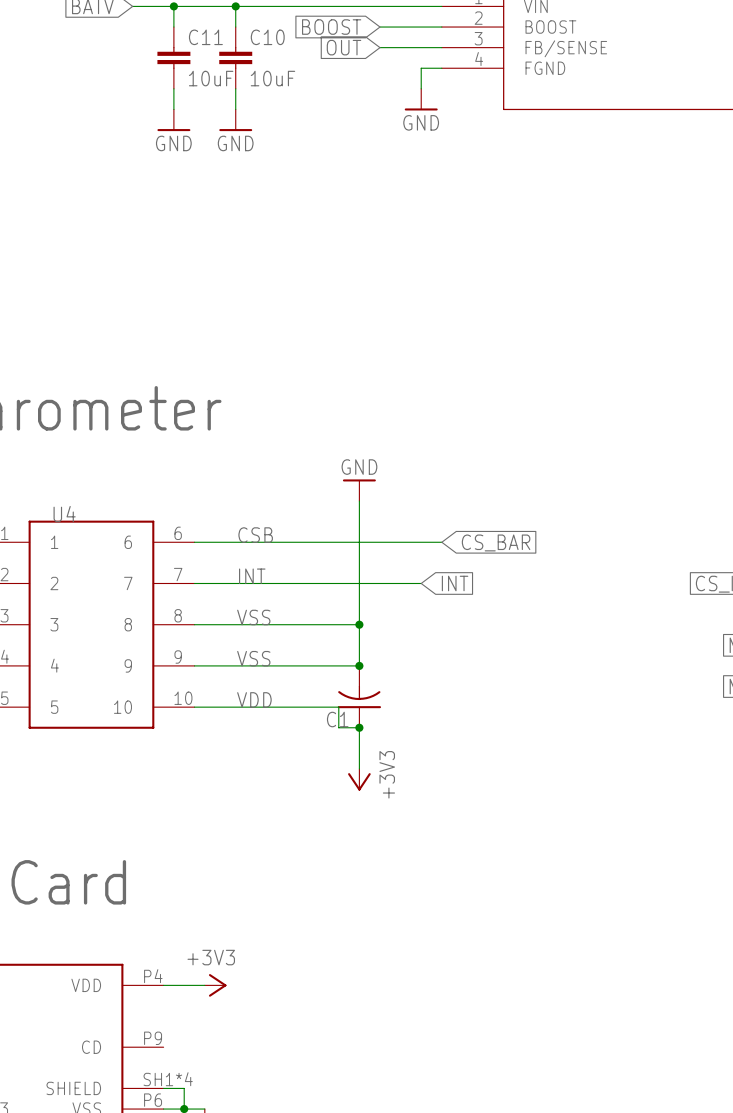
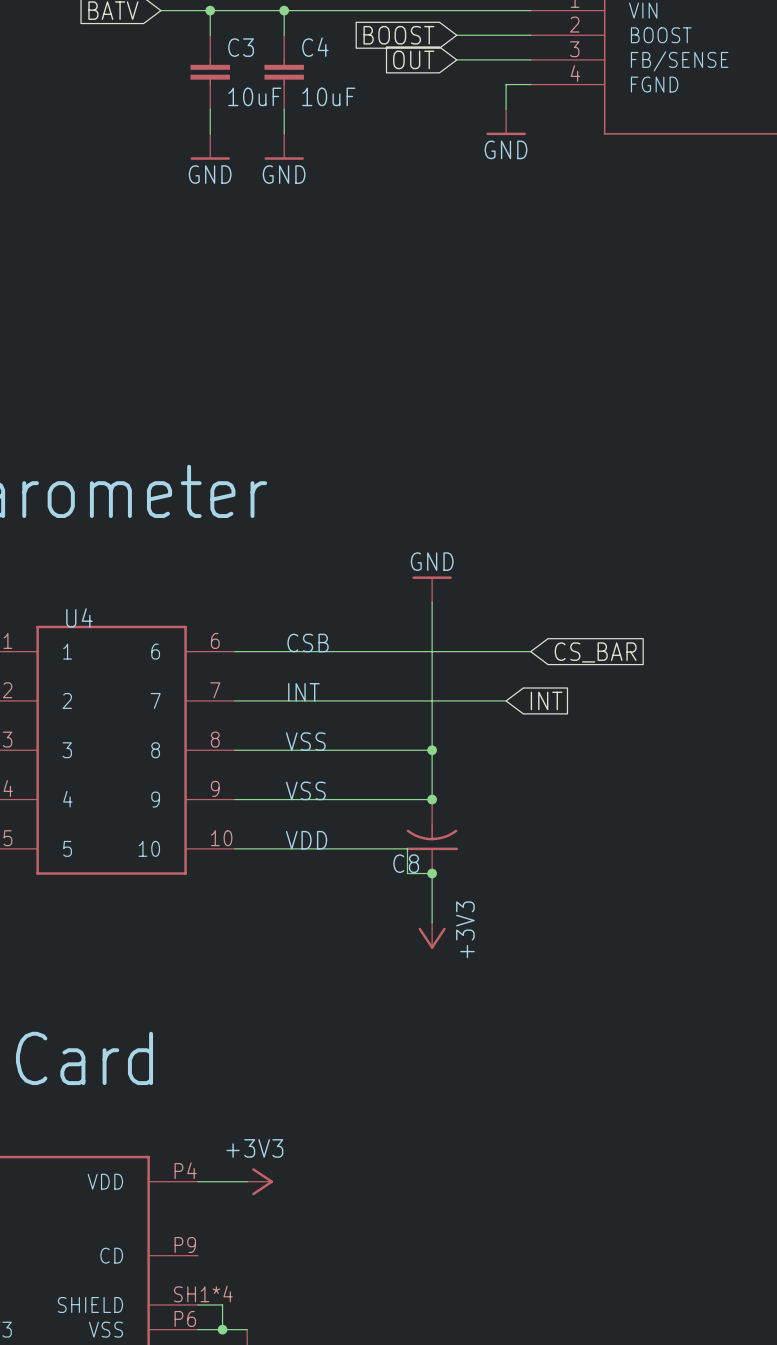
C11 name: C11 (205, 37) -> C3 (241, 47)
C10 name: C10 (267, 37) -> C4 (315, 47)
C1 name: C1 (337, 719) -> C8 (406, 863)

